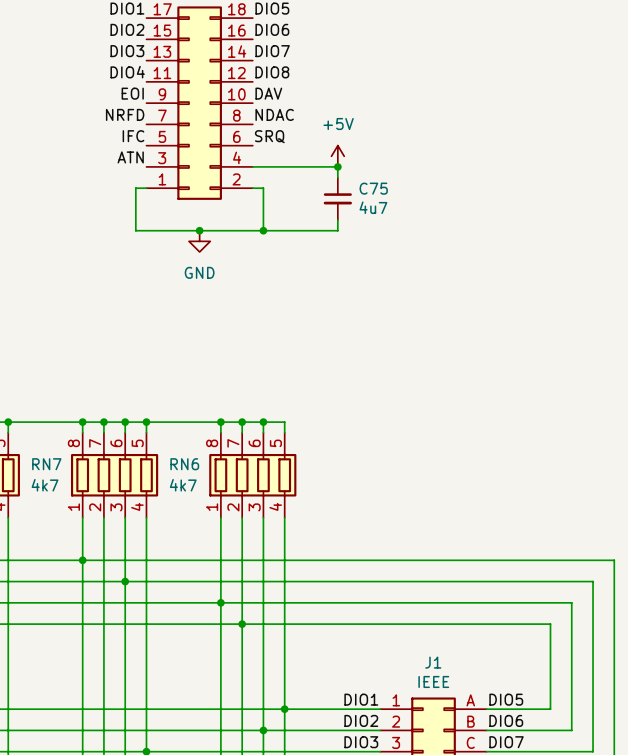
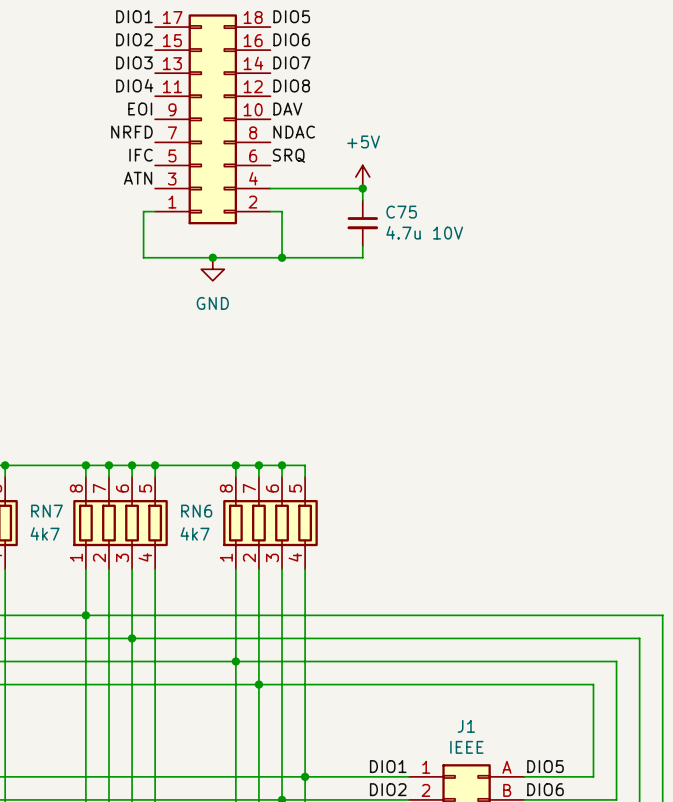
C75 value: 4u7 (373, 207) -> 4.7u 10V (424, 232)

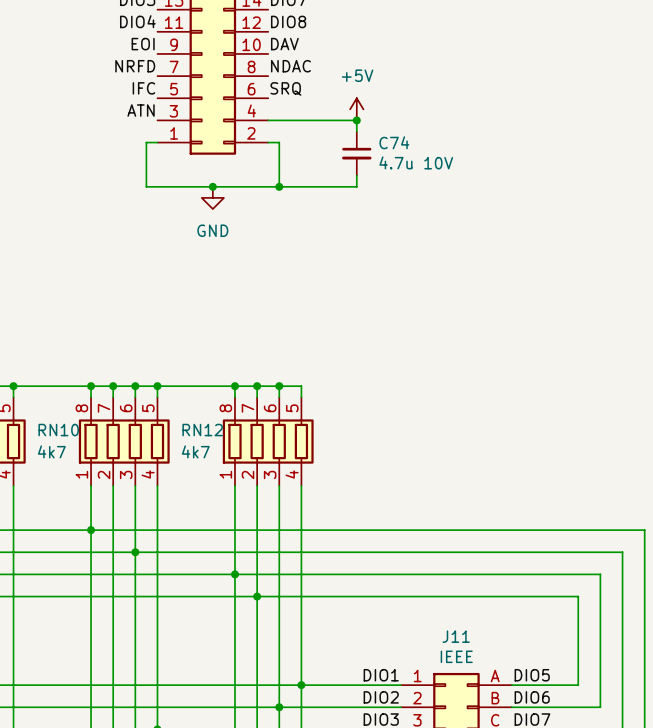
C75 name: C75 (401, 212) -> C74 (394, 142)
RN7 name: RN7 (46, 511) -> RN10 (58, 430)
RN6 name: RN6 (196, 511) -> RN12 (202, 430)
J1 name: J1 (466, 726) -> J11 (456, 636)

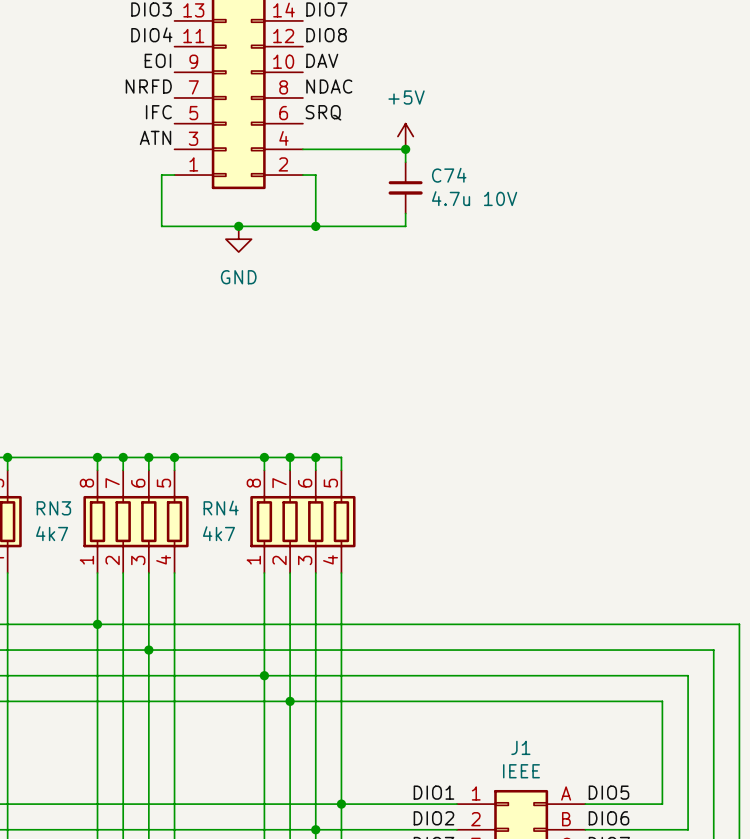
RN10 name: RN10 (58, 430) -> RN3 (53, 508)
RN12 name: RN12 (202, 430) -> RN4 (221, 508)
J11 name: J11 (456, 636) -> J1 (520, 747)

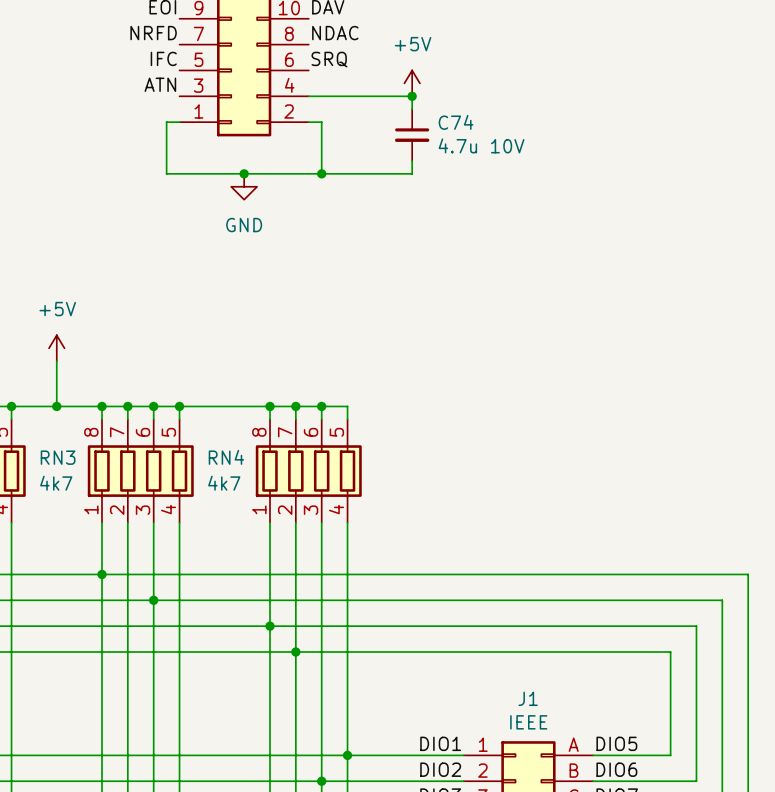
power symbol: none -> +5V (56, 348)
wire: none -> (56, 361) (56, 406)
junction: none -> (56, 406)

